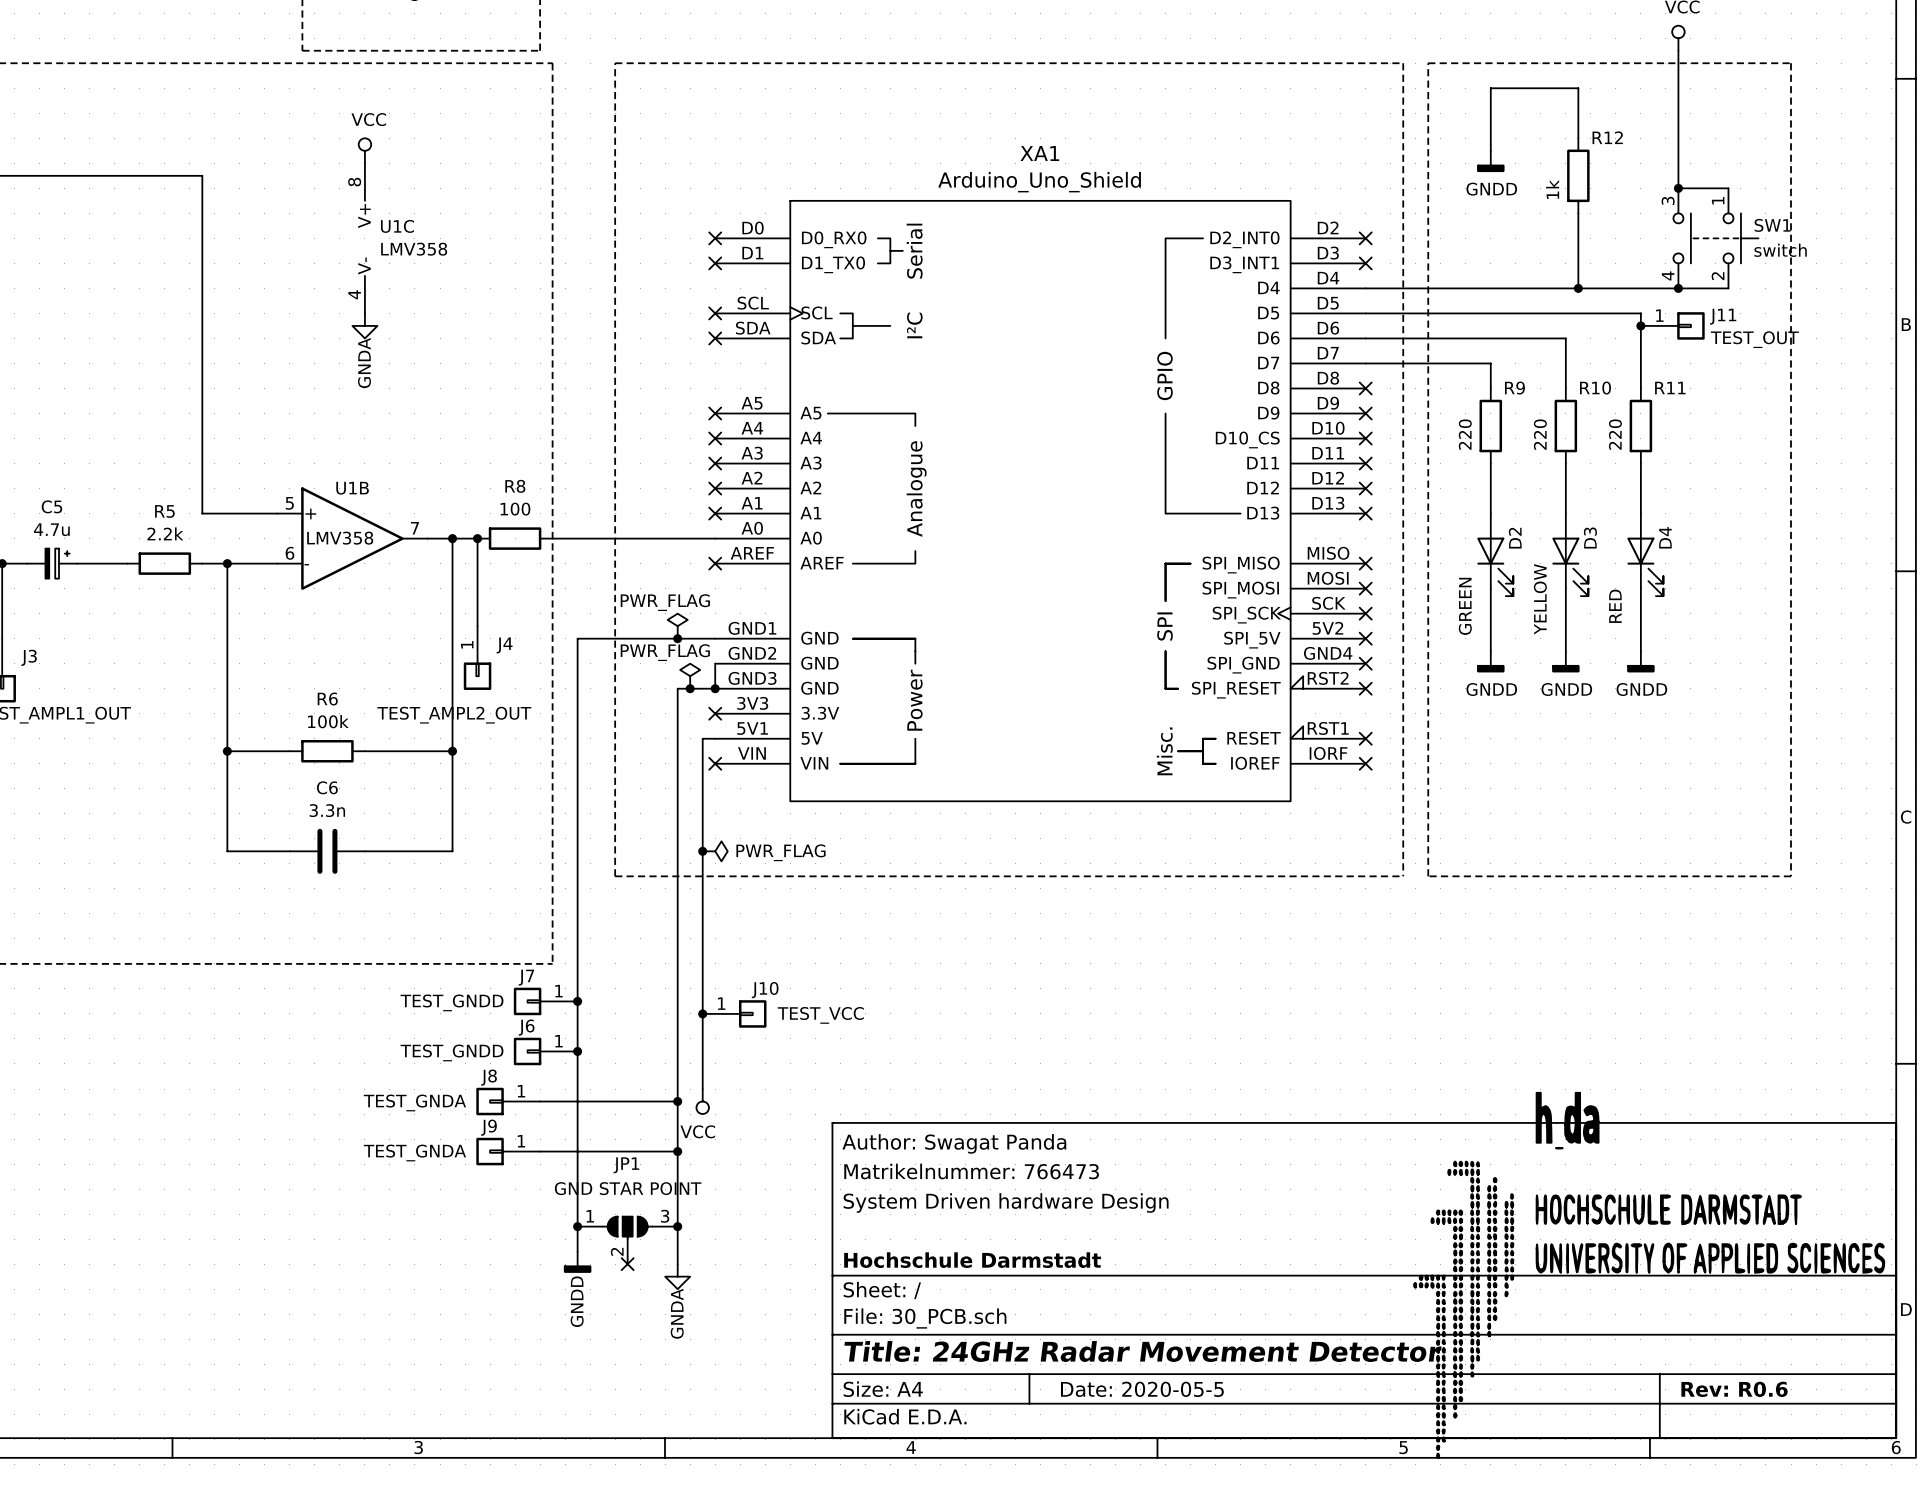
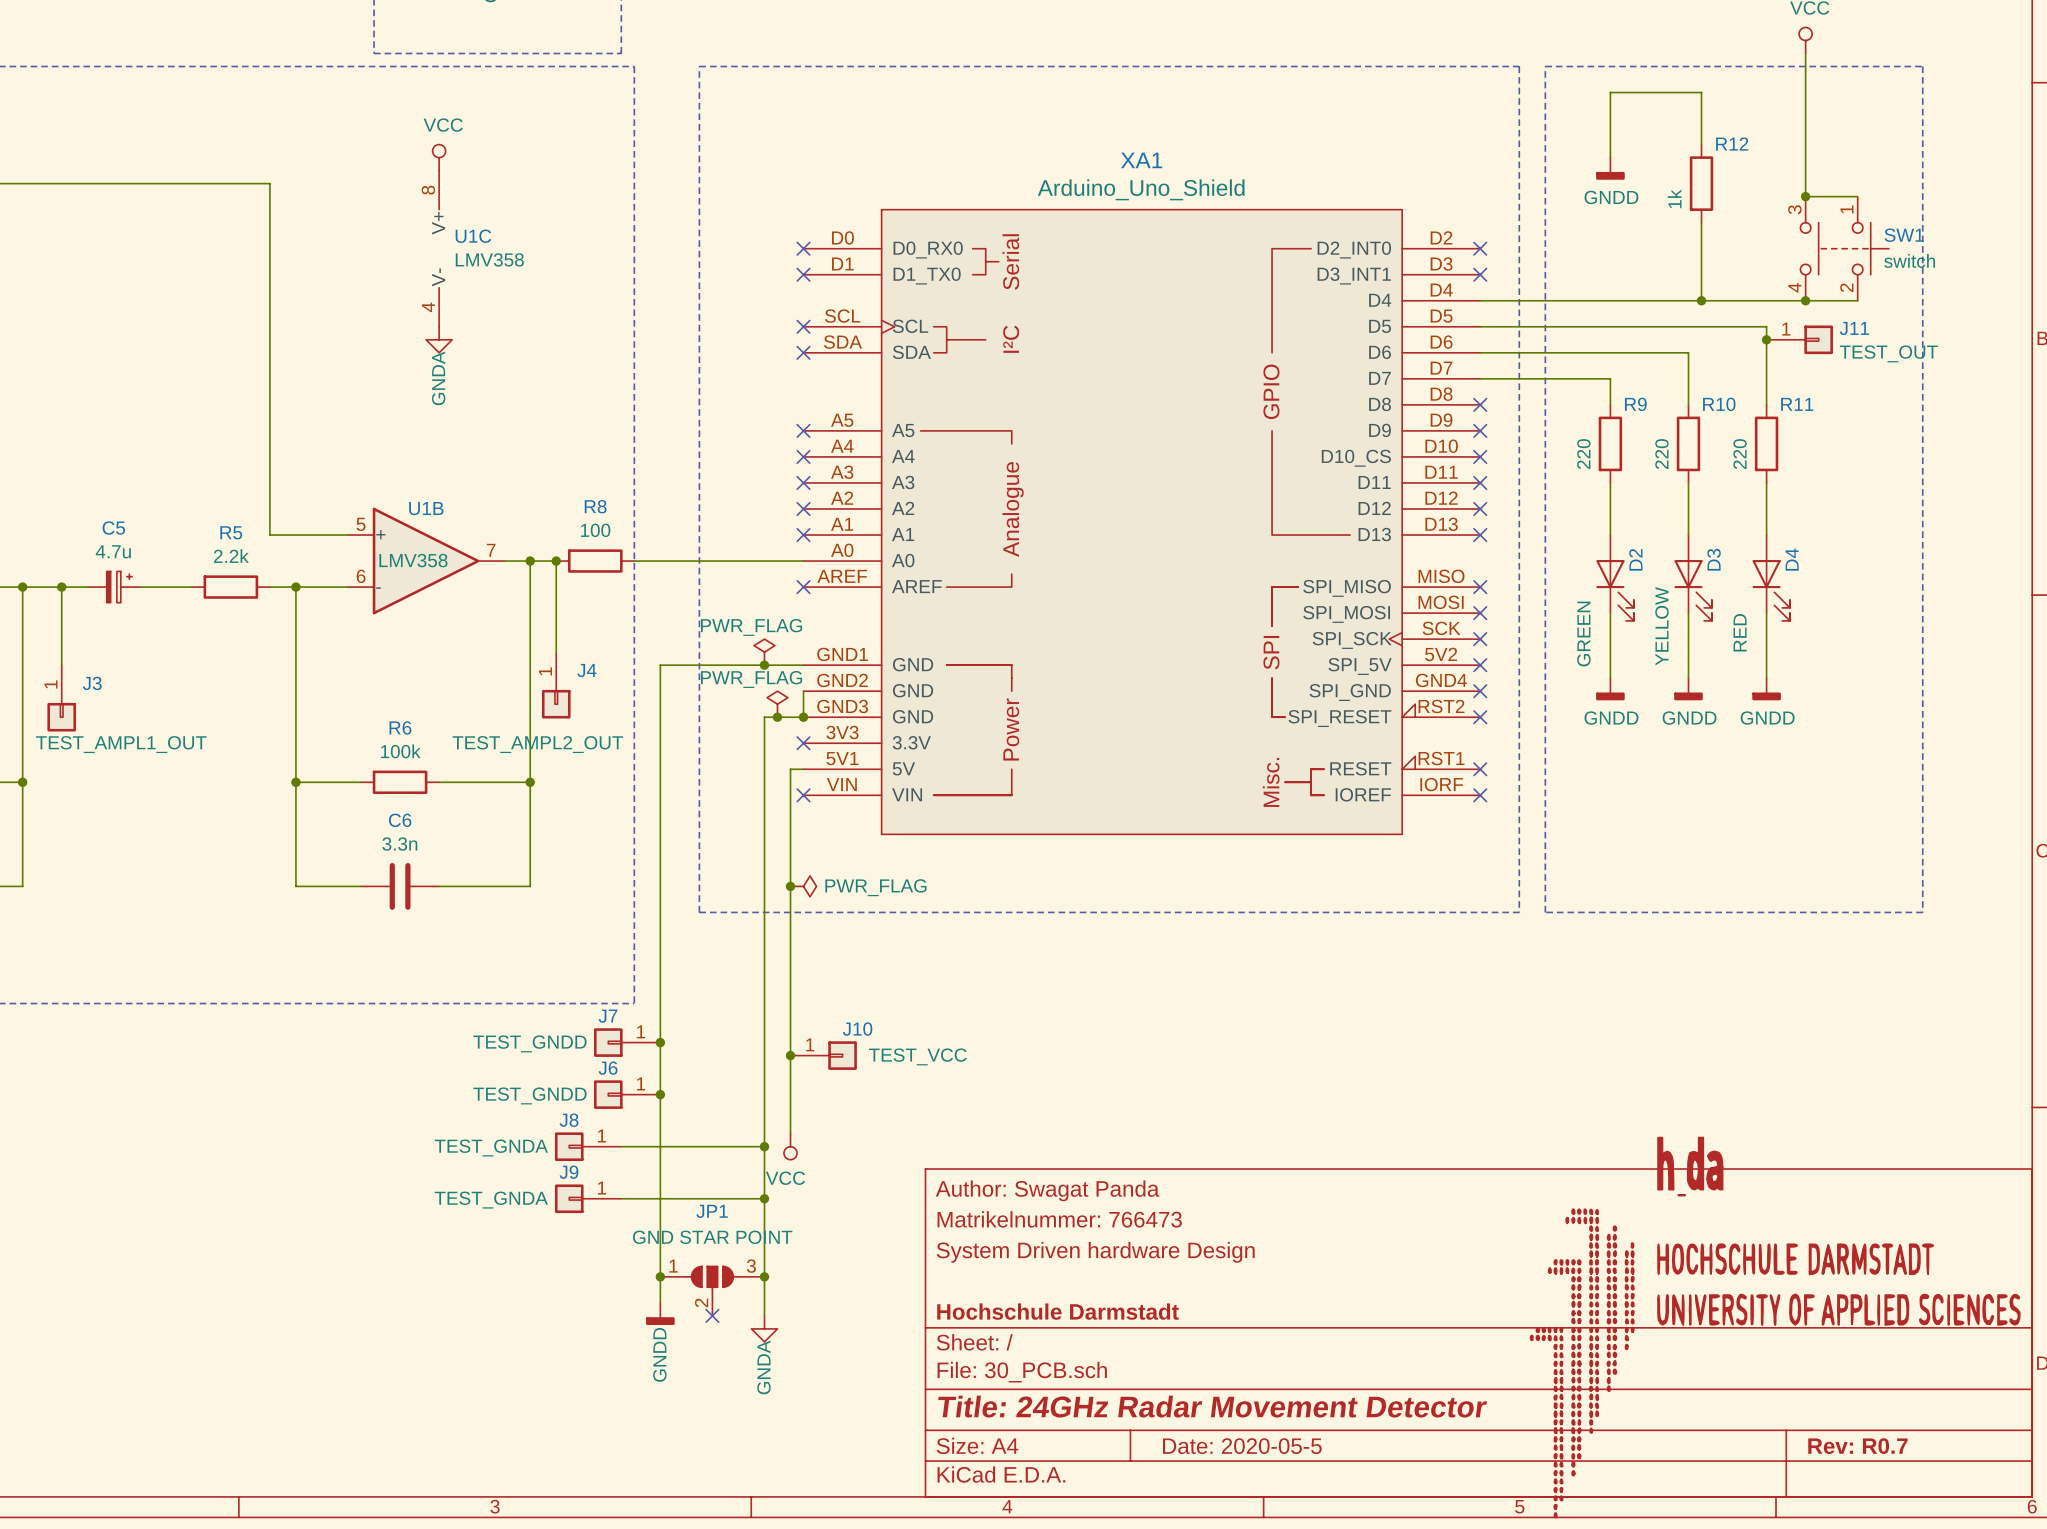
title block: Rev: R0.6 (1734, 1389) -> Rev: R0.7 (1857, 1446)

